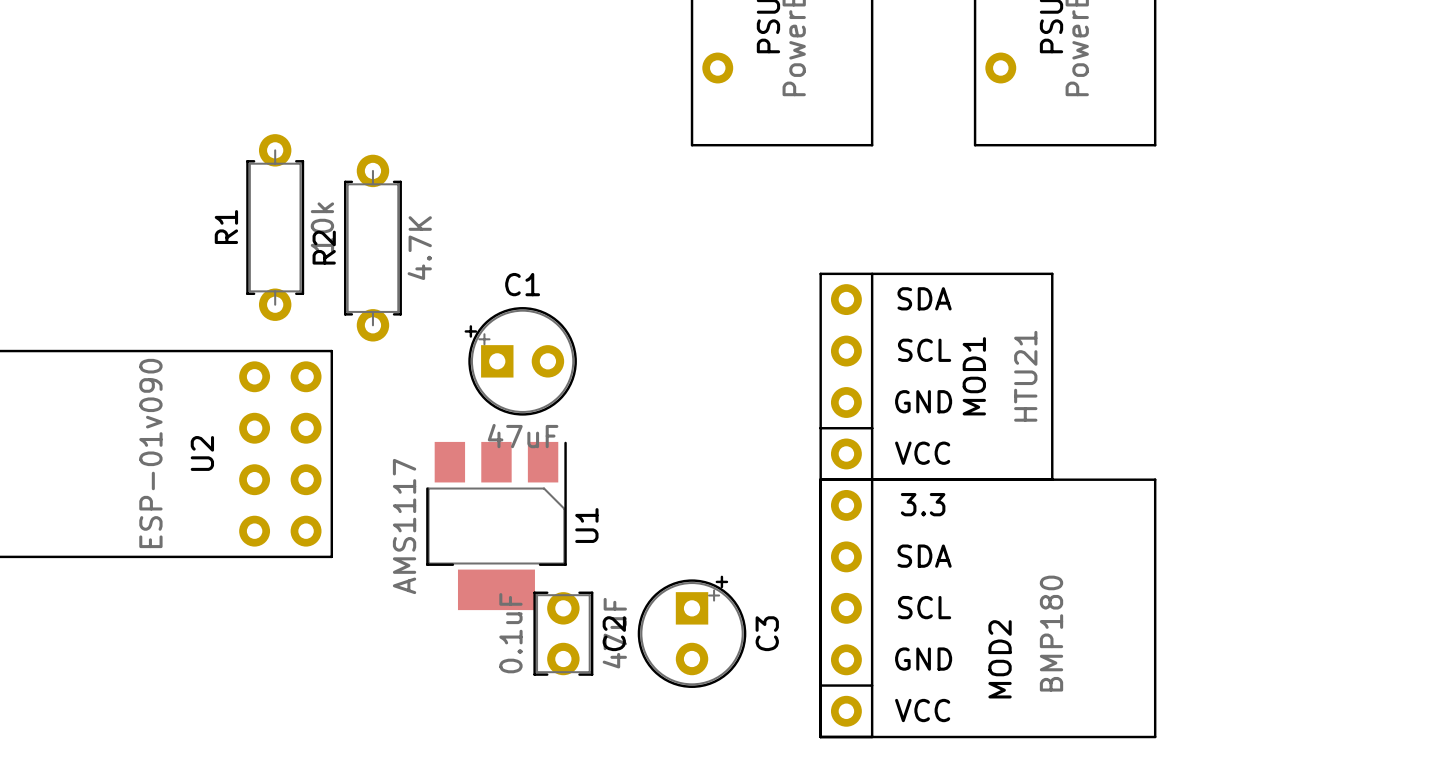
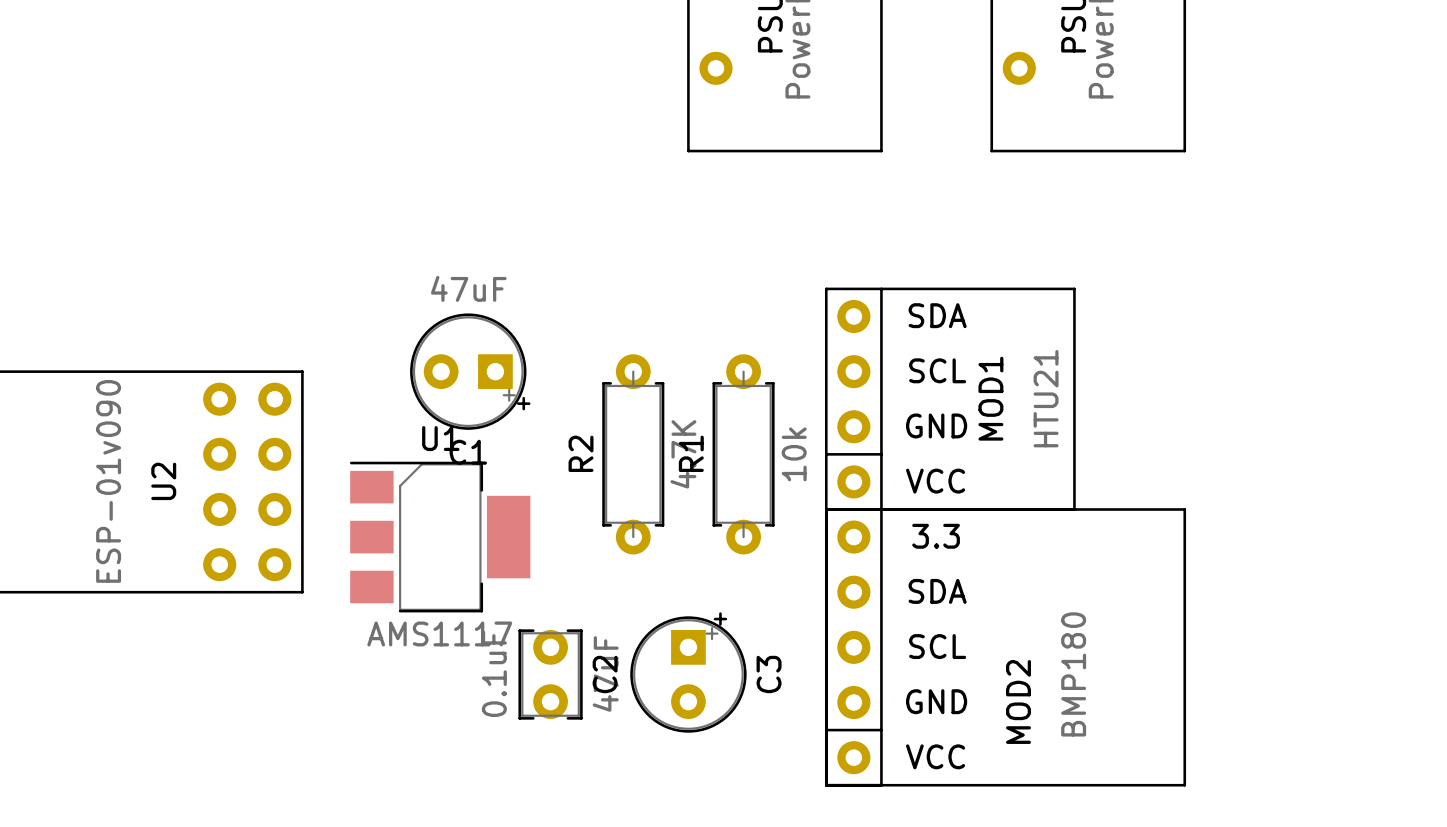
R1 position: (275, 227) -> (743, 454)
R2 position: (372, 248) -> (633, 454)
C1 rotation: 0° (520, 361) -> 180° (470, 371)
U1 rotation: 0° (496, 525) -> 90° counterclockwise (440, 537)

